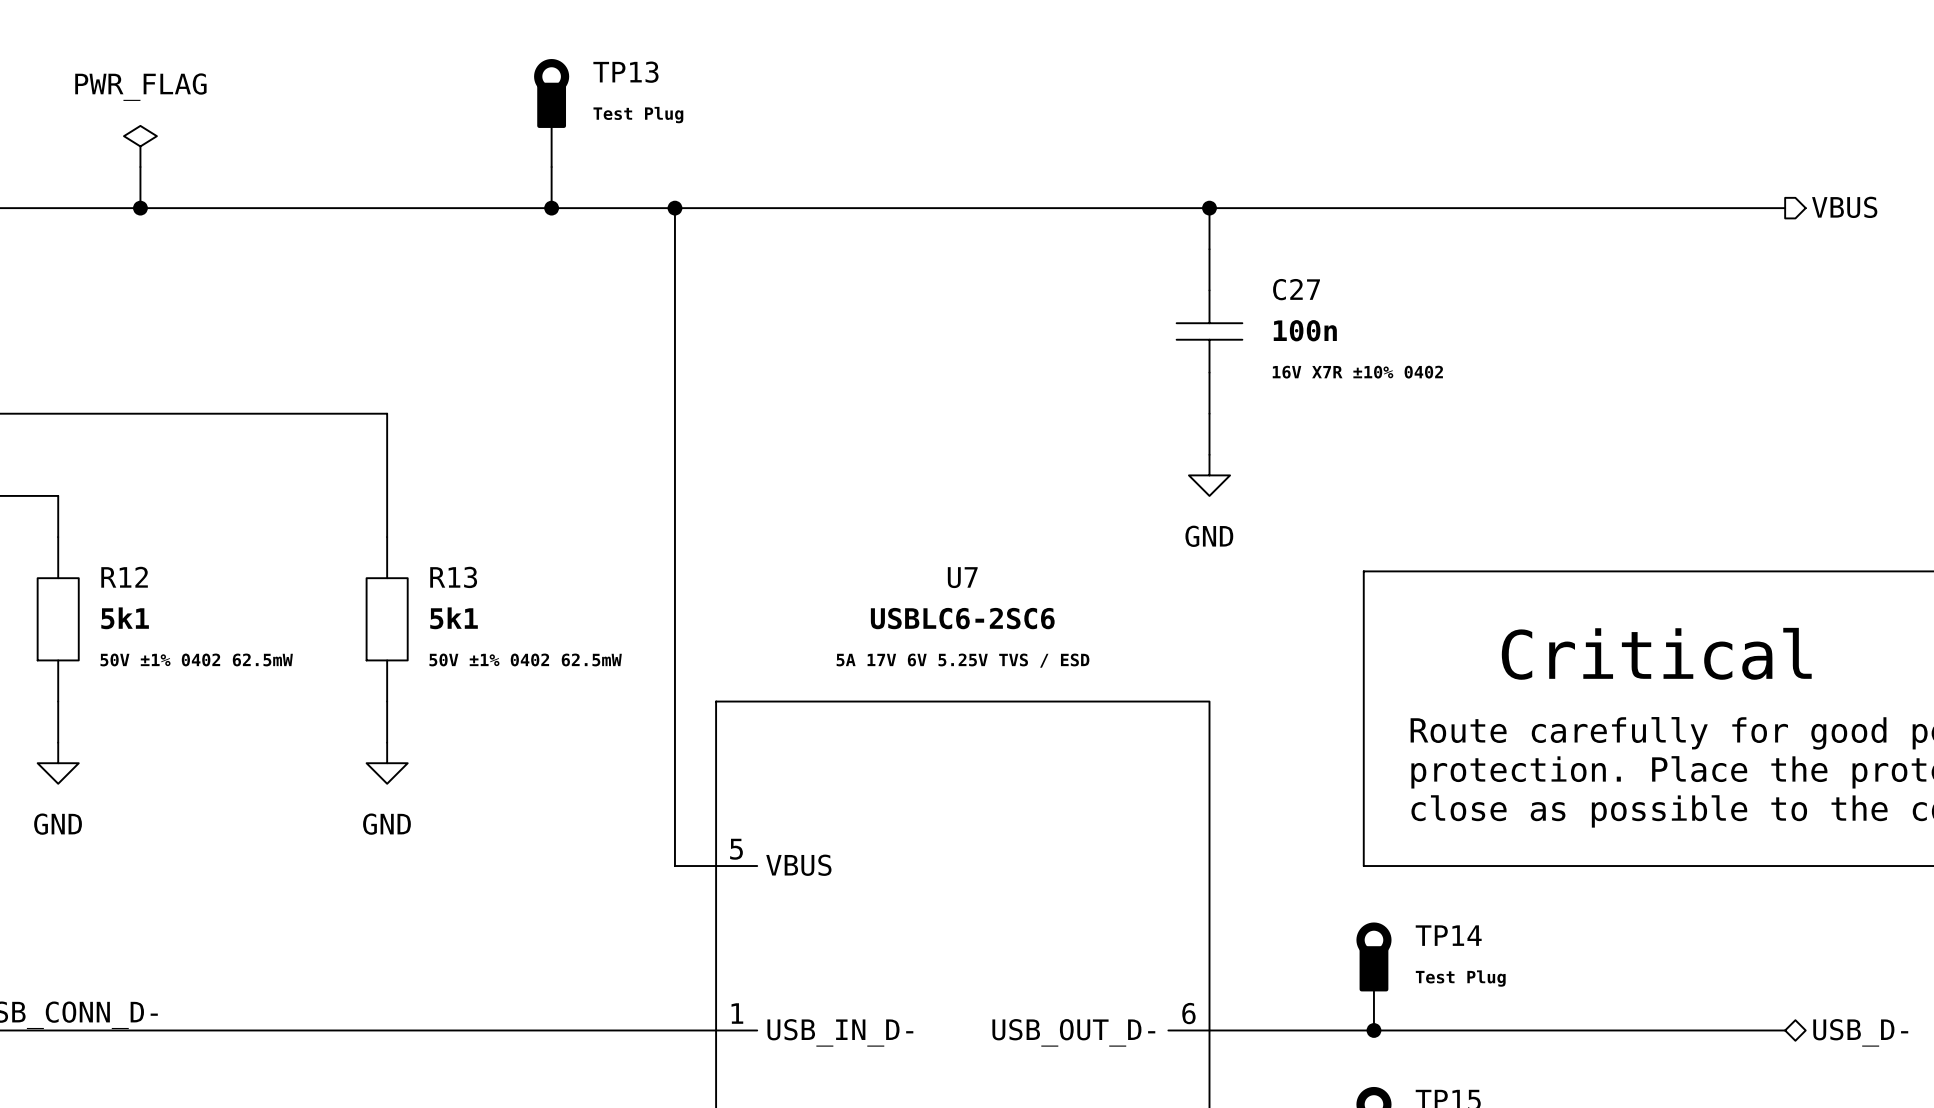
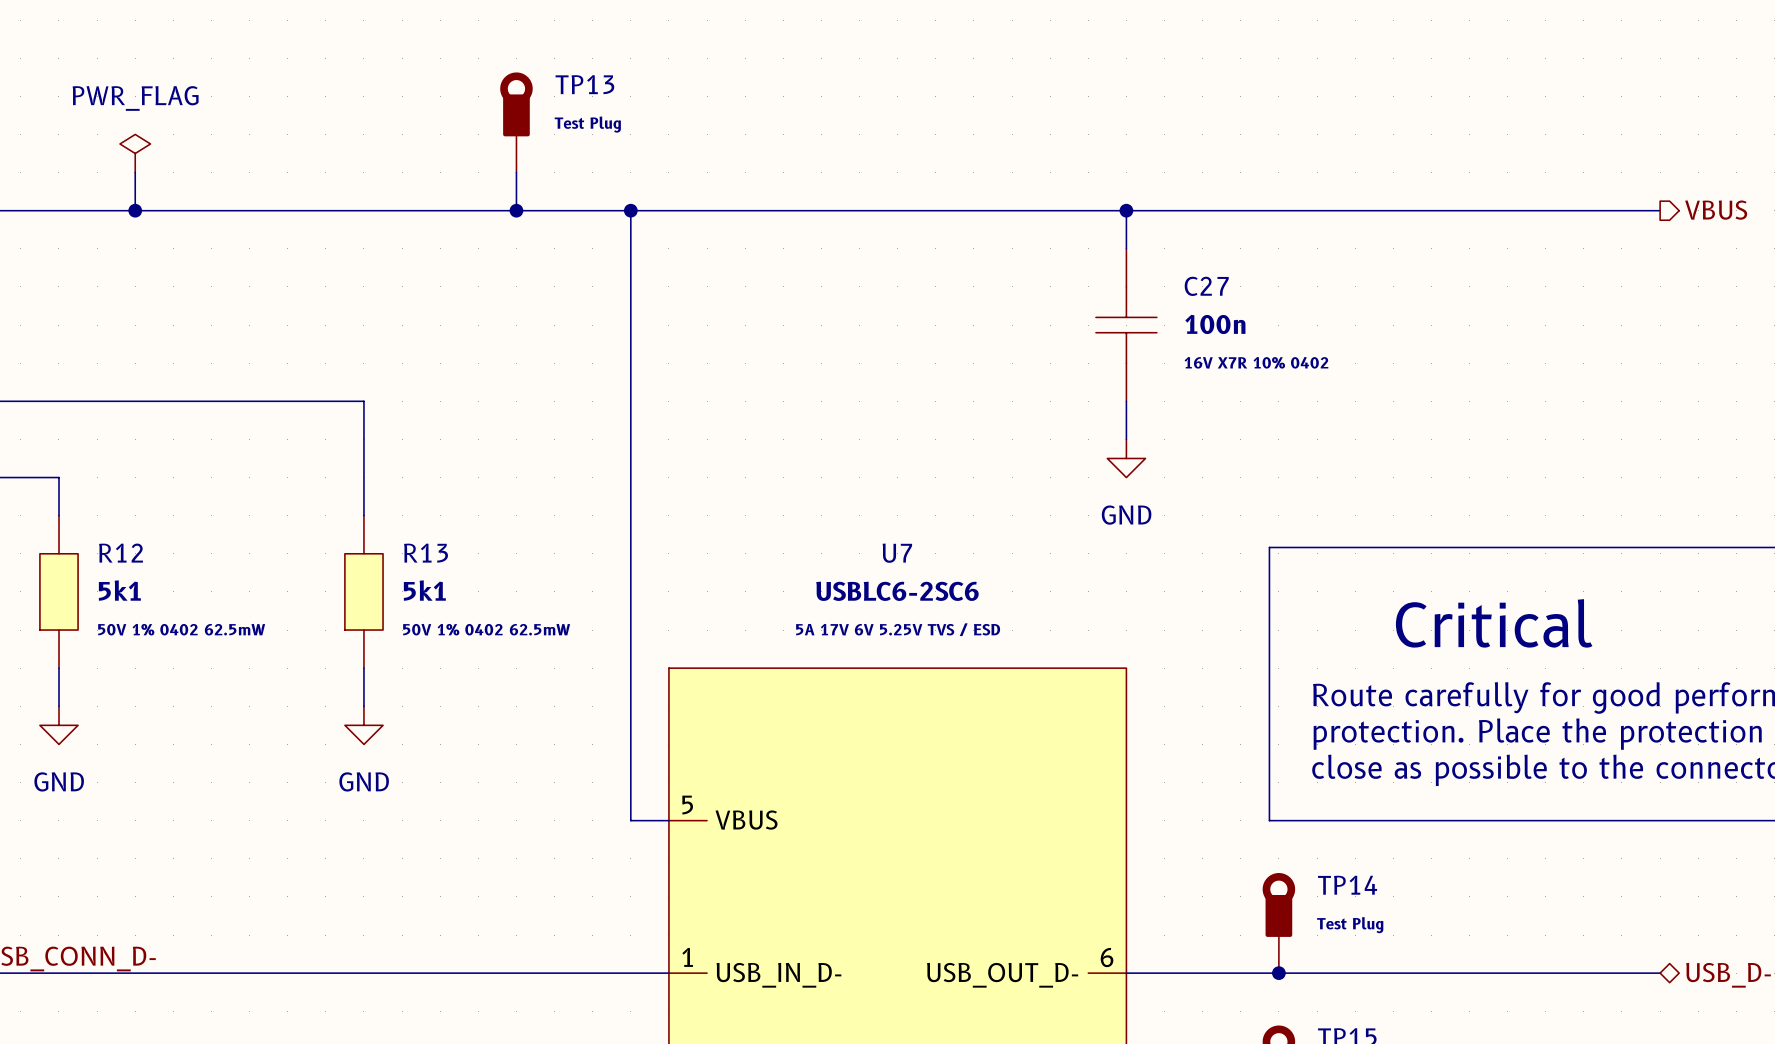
C27 text: 16V X7R ±10% 0402 (1357, 372) -> 16V X7R 10% 0402 (1256, 362)
R12 text: 50V ±1% 0402 62.5mW (196, 659) -> 50V 1% 0402 62.5mW (181, 629)
R13 text: 50V ±1% 0402 62.5mW (525, 659) -> 50V 1% 0402 62.5mW (486, 629)

